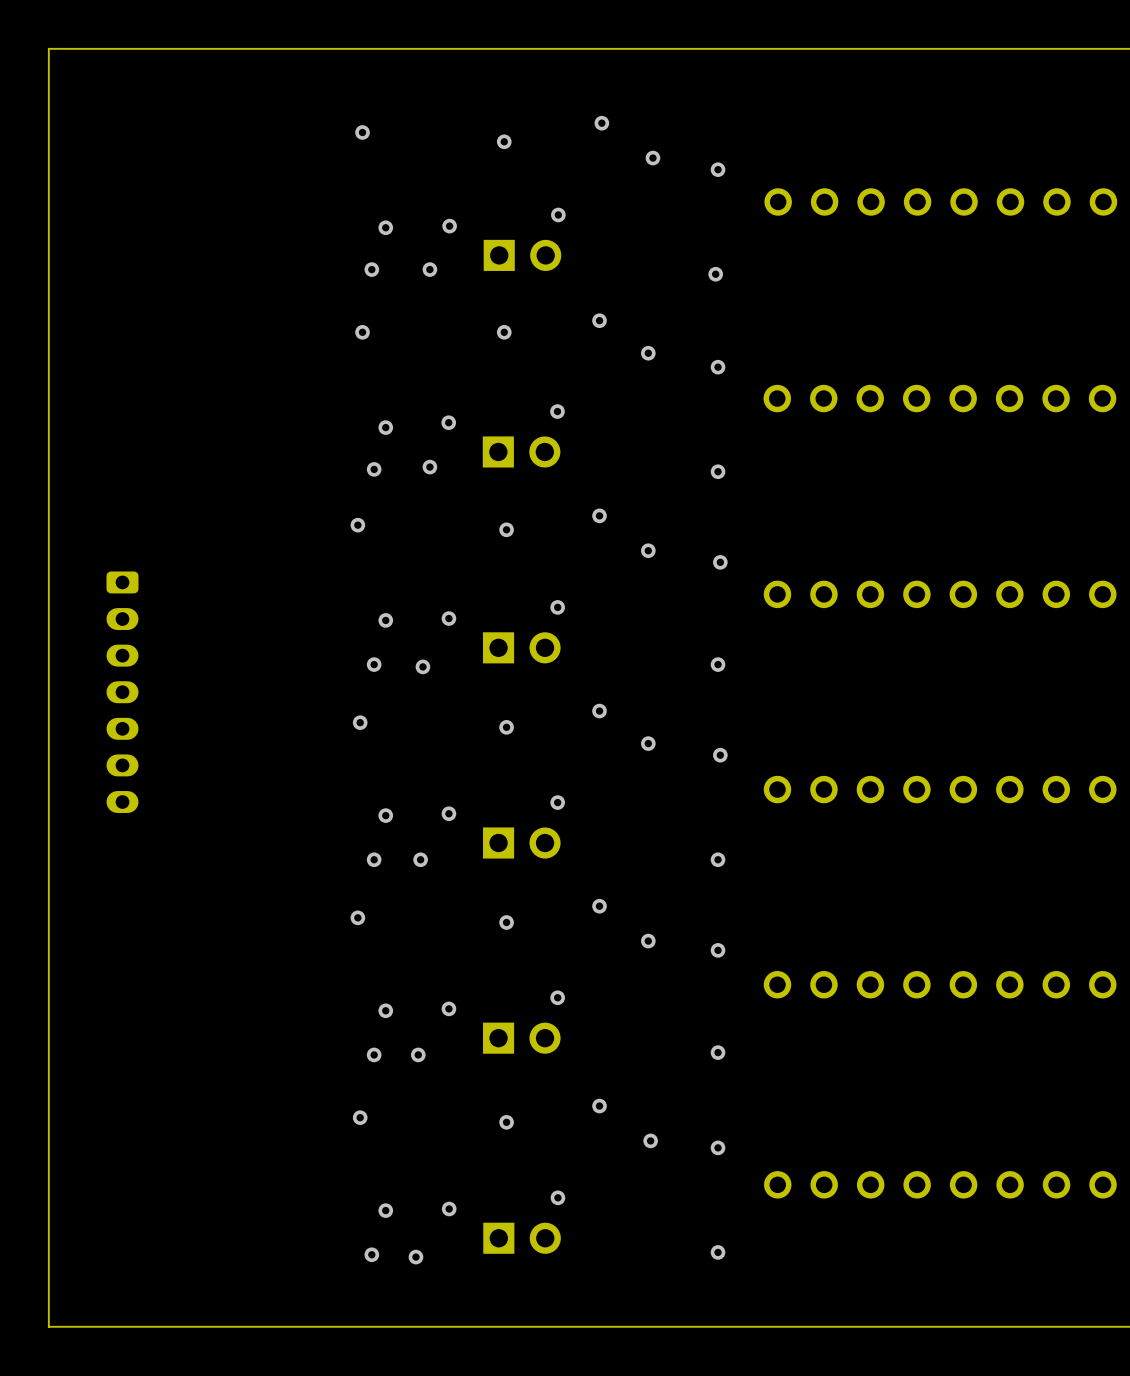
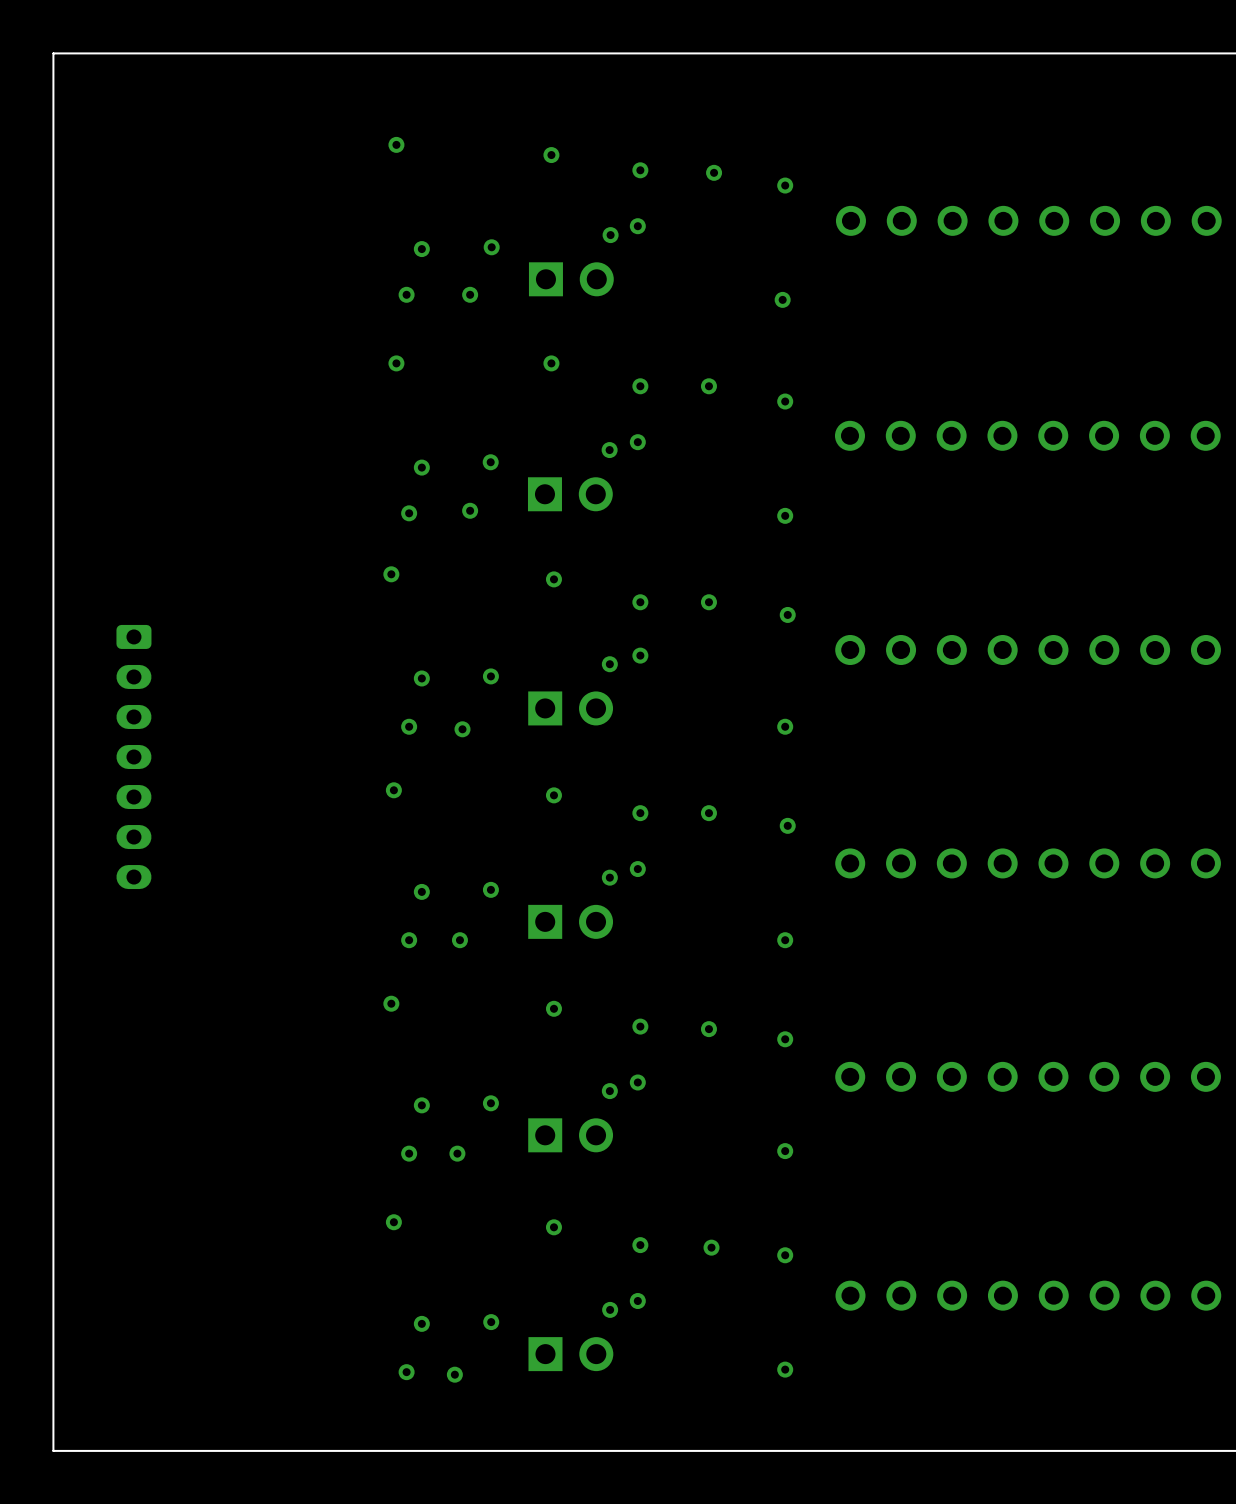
via position: (601, 123) -> (640, 170)
via: none -> (637, 226)
via position: (599, 320) -> (640, 386)
via: none -> (637, 442)
via position: (599, 515) -> (640, 602)
via: none -> (640, 655)
via position: (599, 711) -> (640, 813)
via: none -> (637, 869)
via position: (599, 906) -> (640, 1026)
via: none -> (637, 1082)
via position: (599, 1106) -> (640, 1245)
via: none -> (637, 1301)

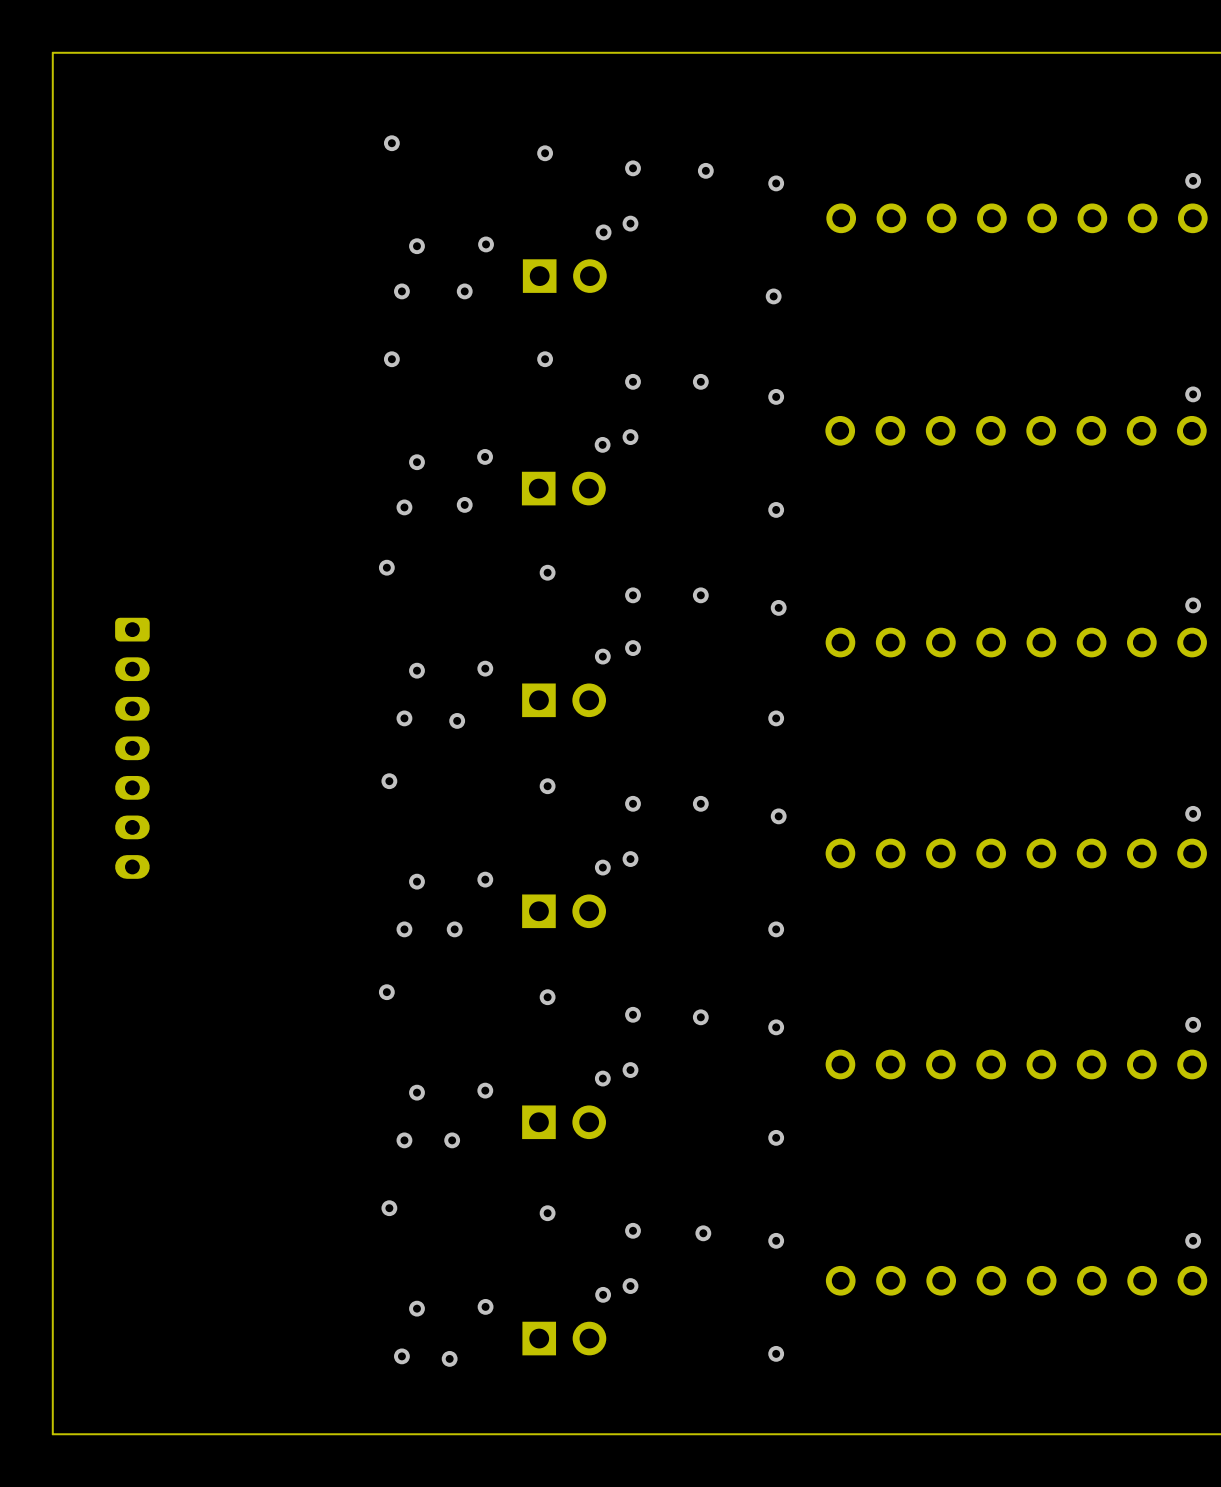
via: none -> (1193, 180)
via: none -> (1193, 394)
via: none -> (1193, 605)
via: none -> (1193, 813)
via: none -> (1193, 1024)
via: none -> (1193, 1240)

